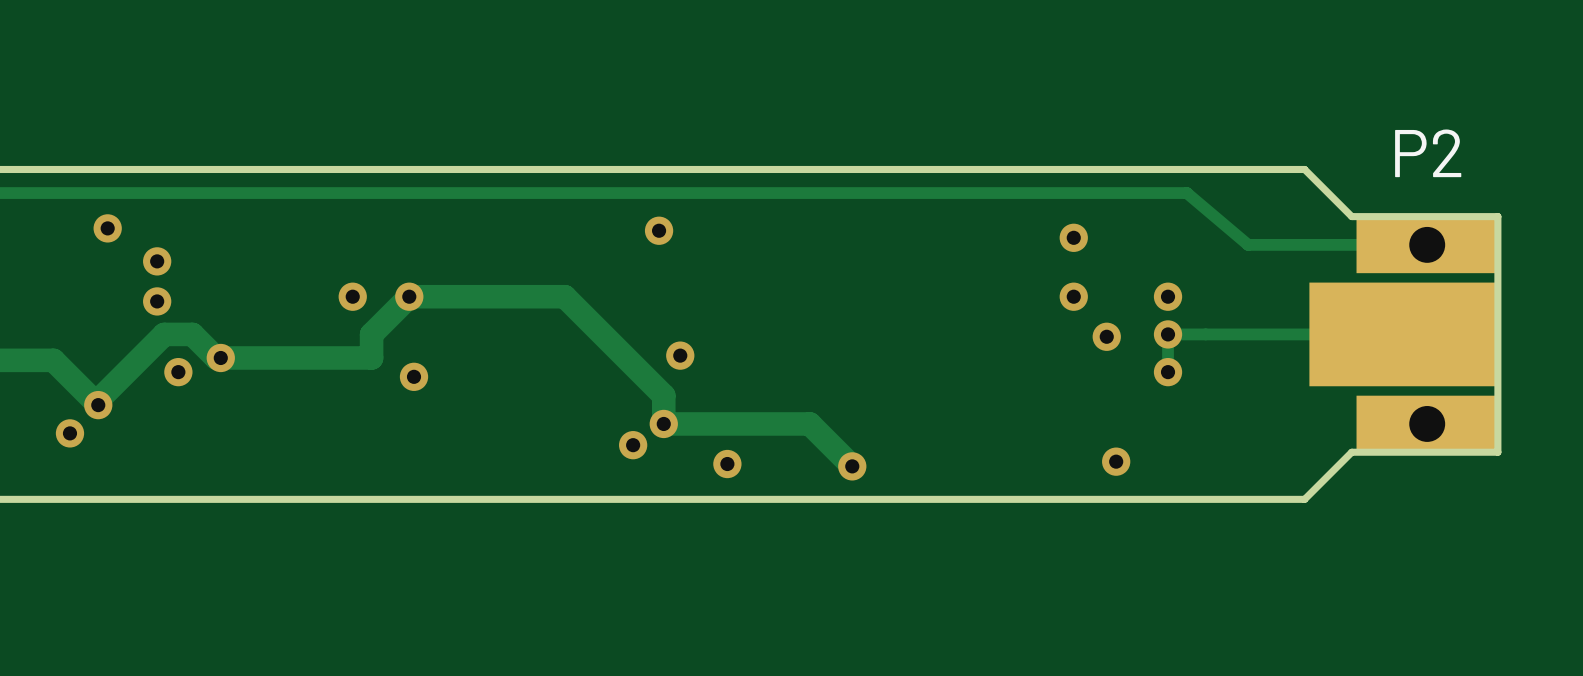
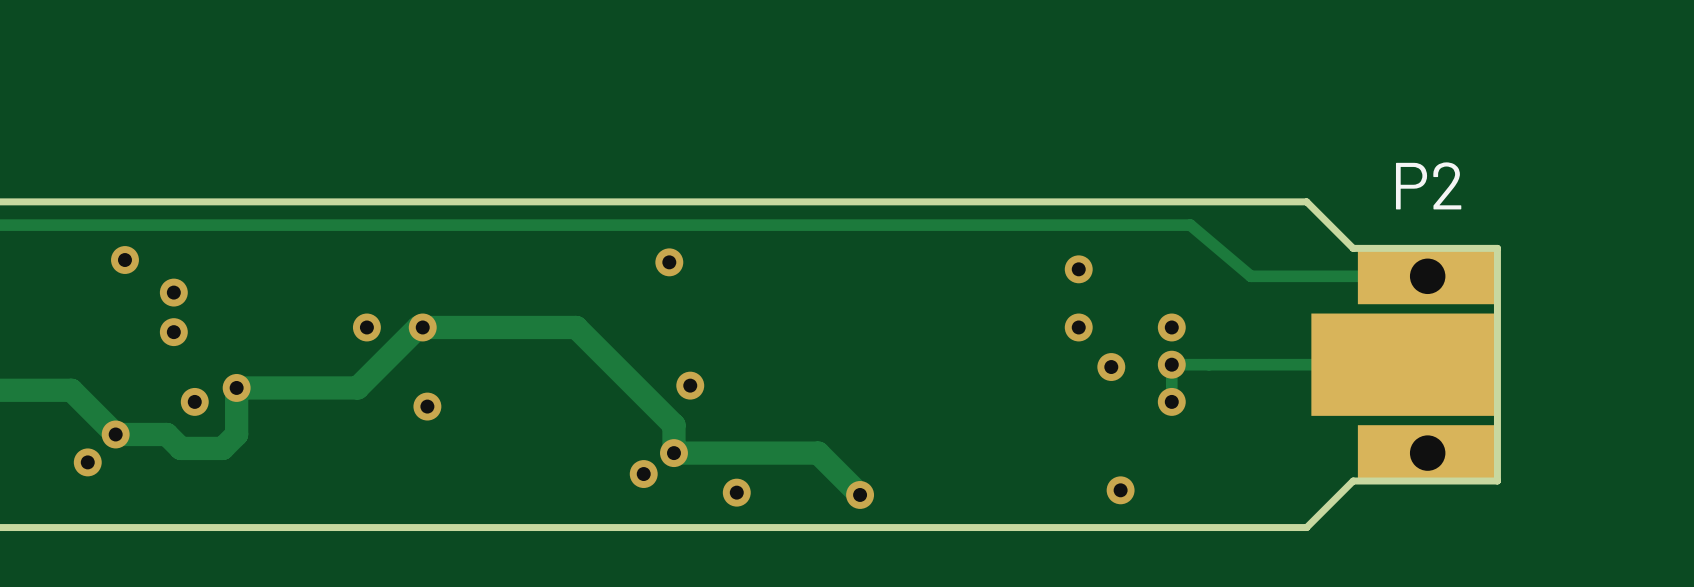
track: (409, 296) (371, 334) (371, 357) (343, 357) -> (422, 327) (418, 327) (357, 387)
track: (220, 357) (216, 357) (192, 334) (164, 334) (98, 400) (98, 405) -> (236, 387) (236, 434) (222, 448) (180, 448) (166, 434) (115, 434)

